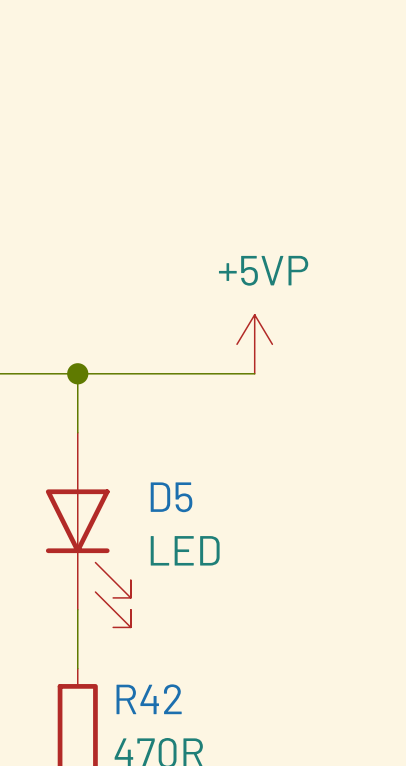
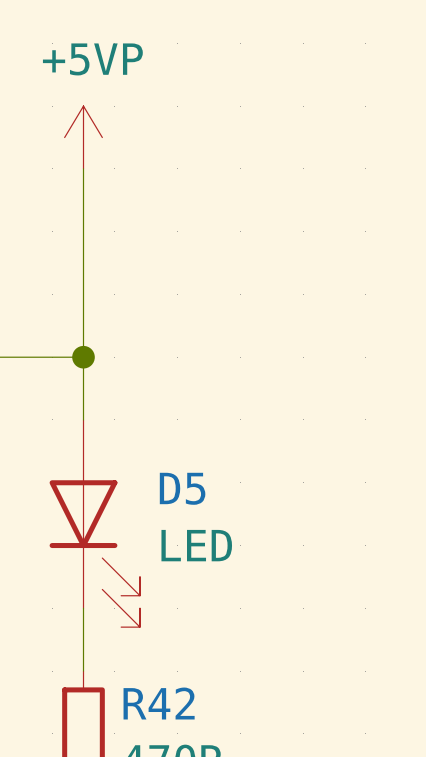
power symbol position: +5VP (254, 344) -> +5VP (83, 137)
wire: (77, 373) (254, 373) -> (83, 357) (83, 168)

